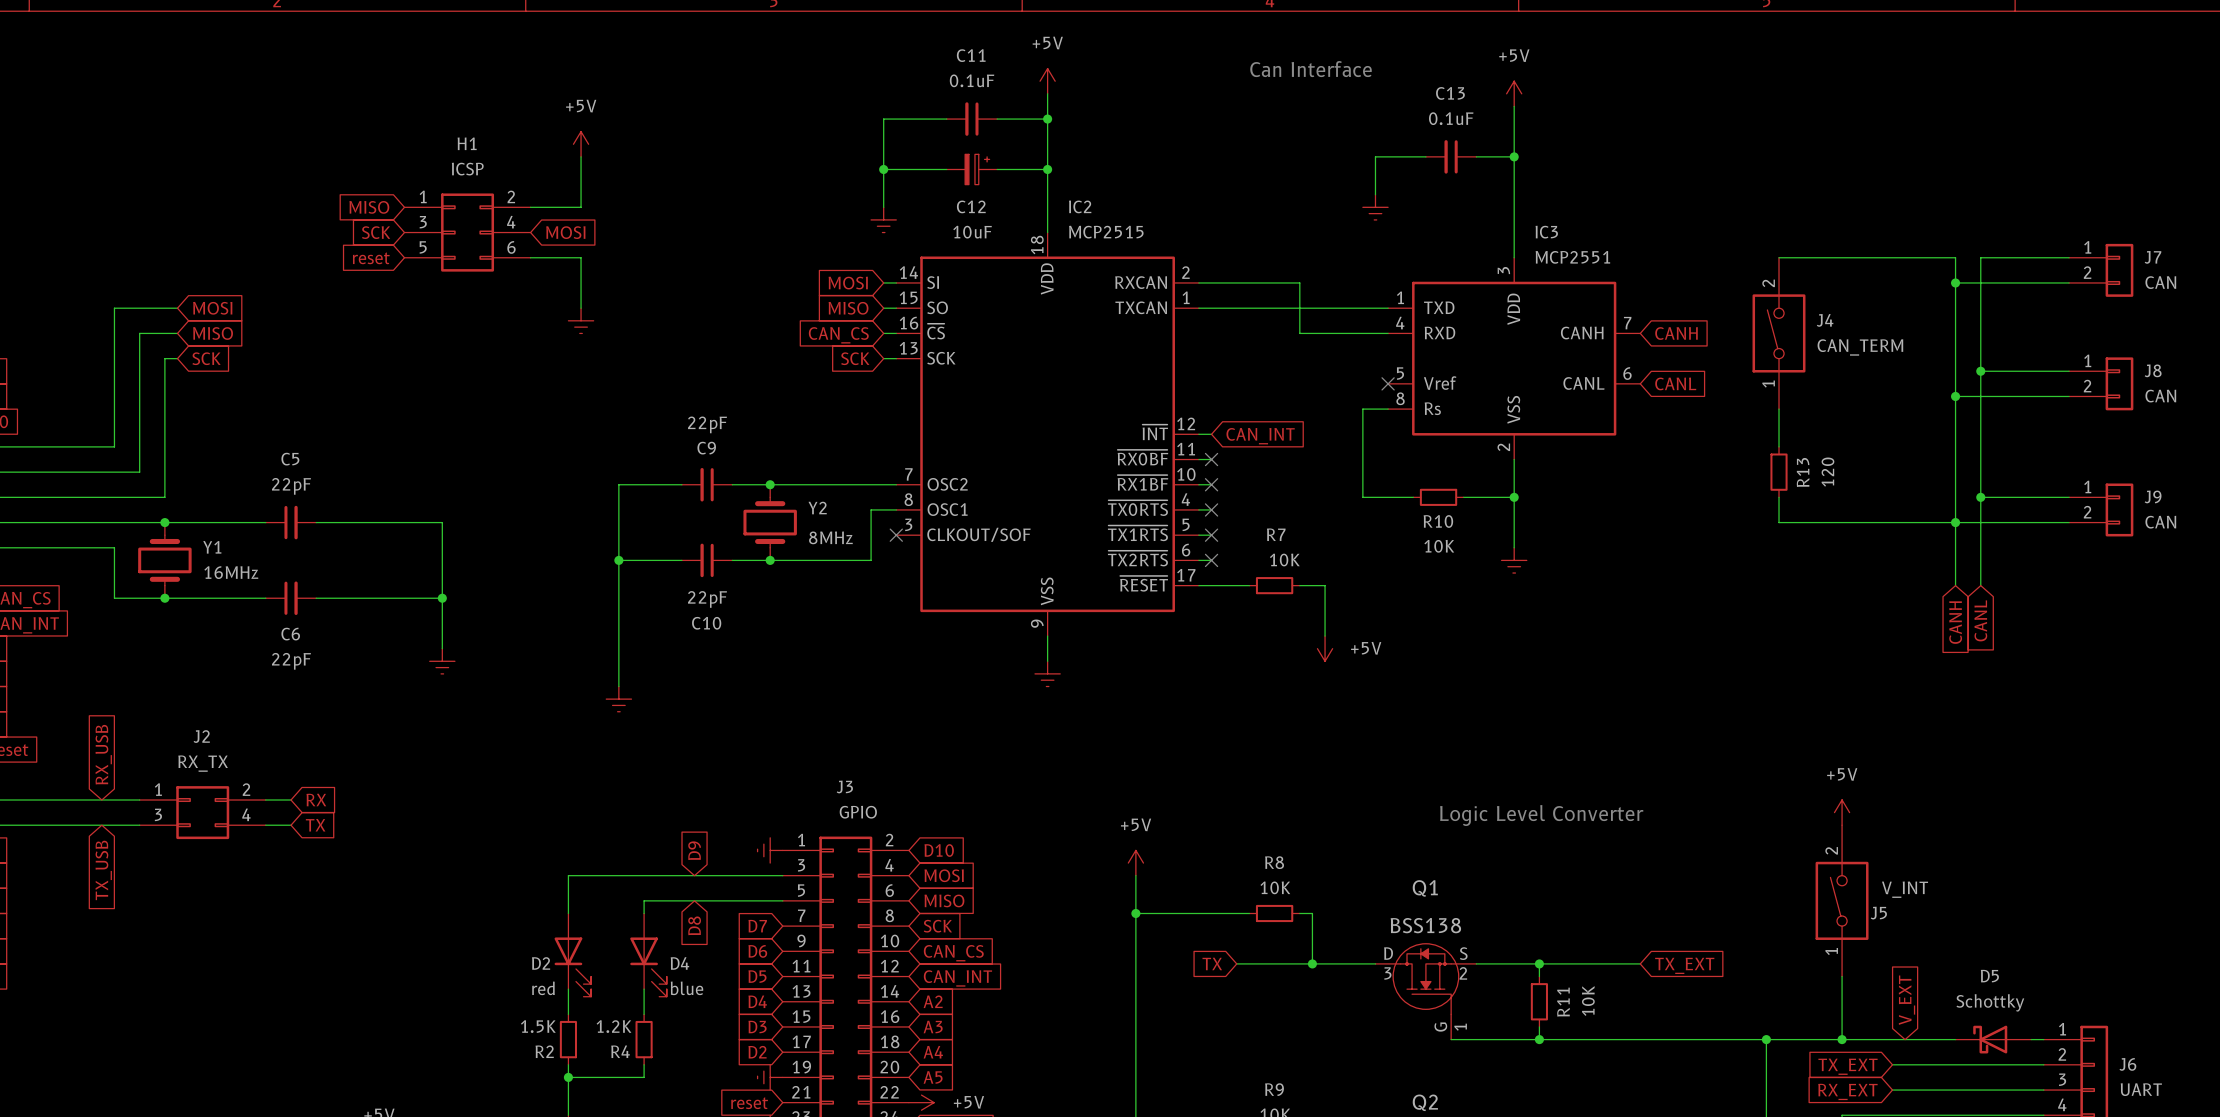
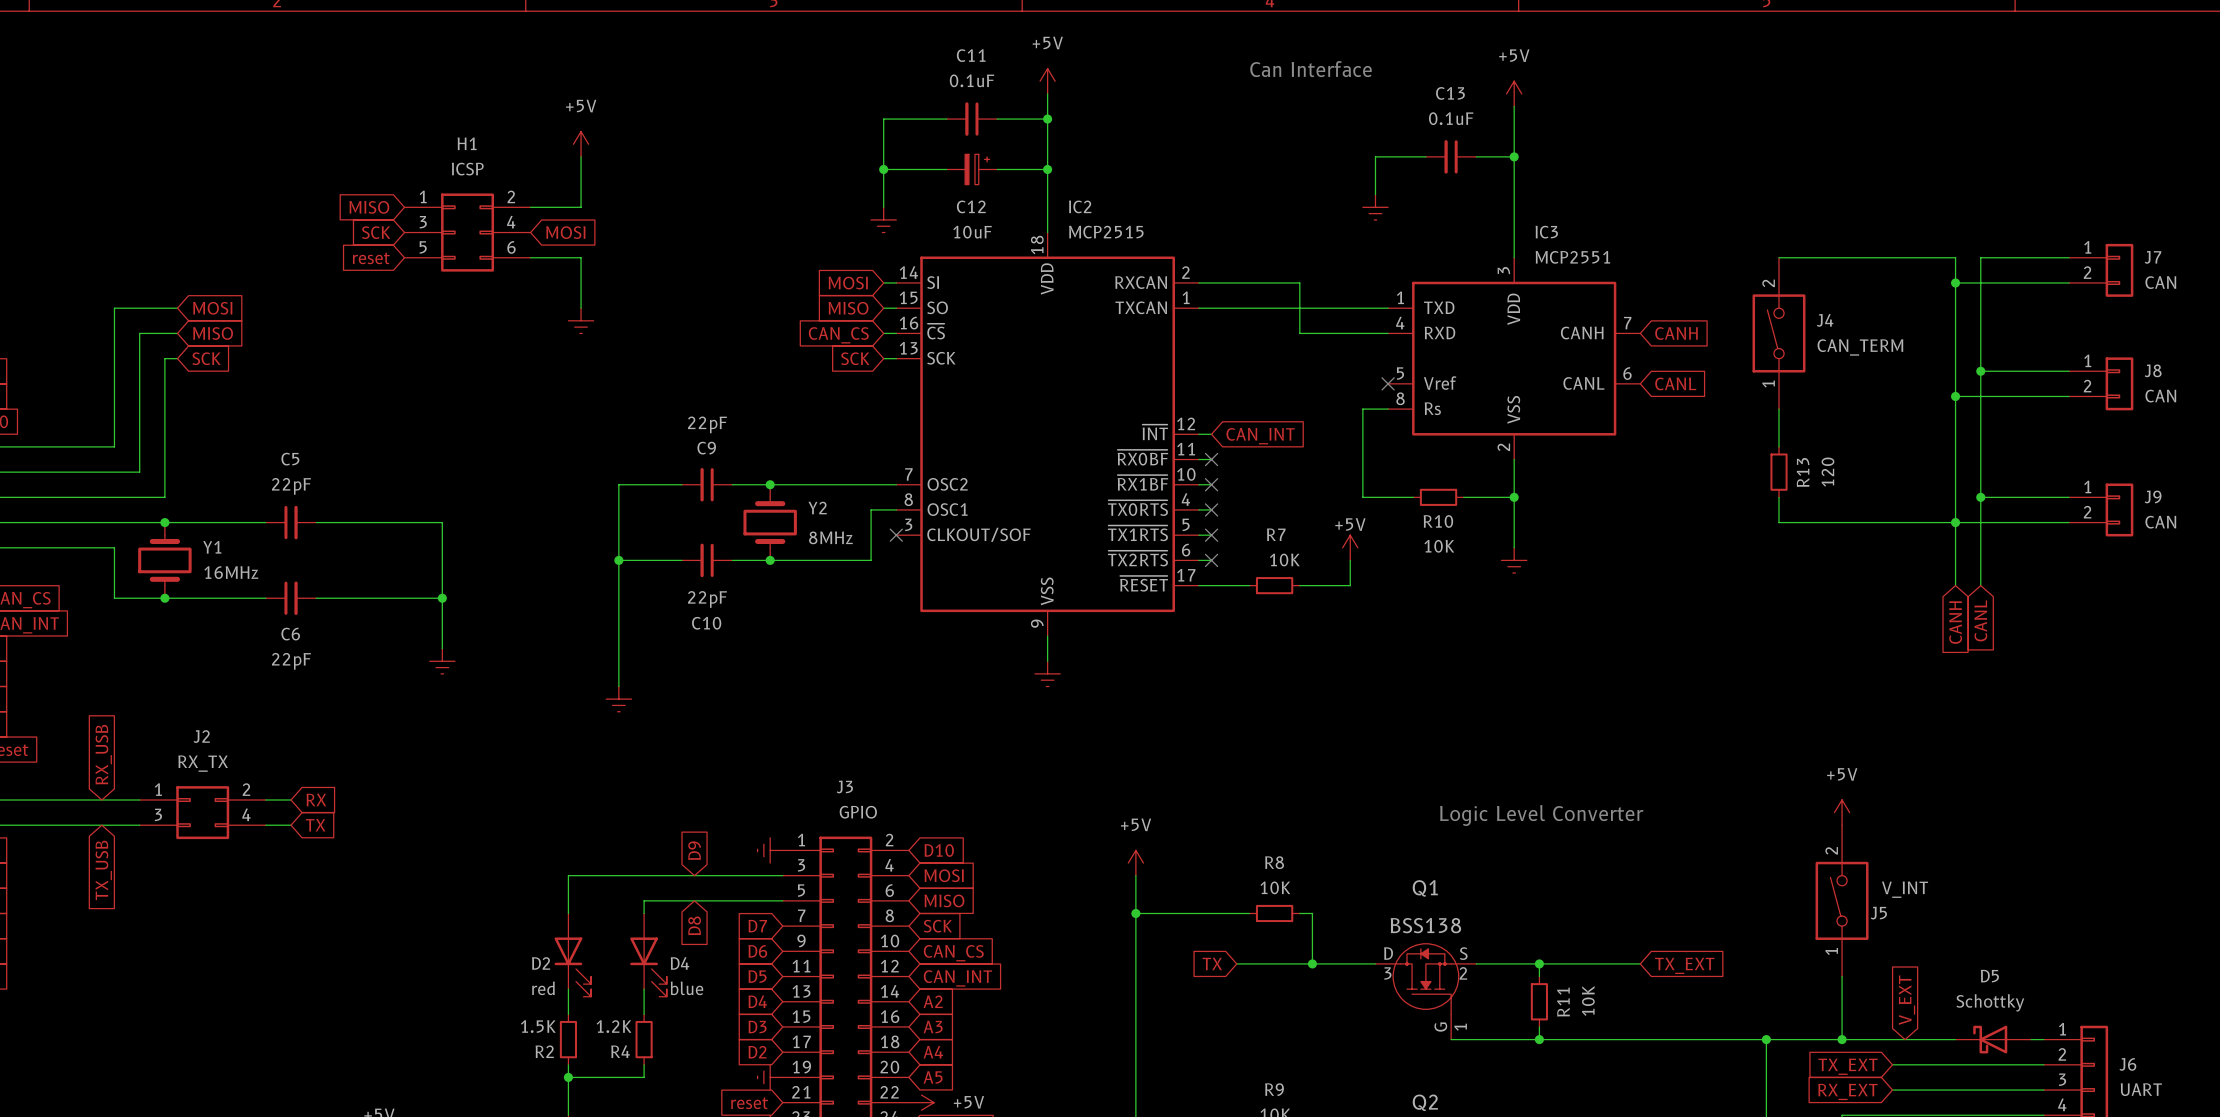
wire: (1325, 585) (1325, 636) -> (1325, 585) (1350, 585) (1350, 560)
power symbol rotation: 0° (1325, 648) -> 180° (1350, 547)
power symbol position: +5V (1325, 648) -> +5V (1350, 547)
power symbol text position: +5V (1366, 648) -> +5V (1350, 524)

